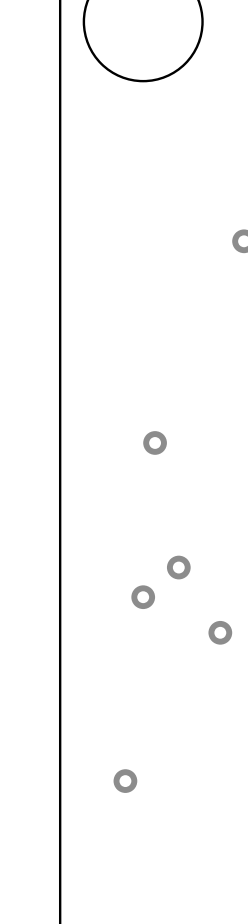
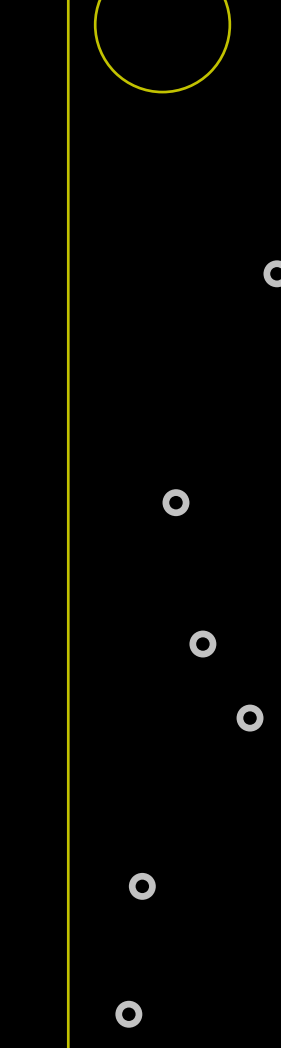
via: (143, 597) -> none
via: none -> (128, 1014)

